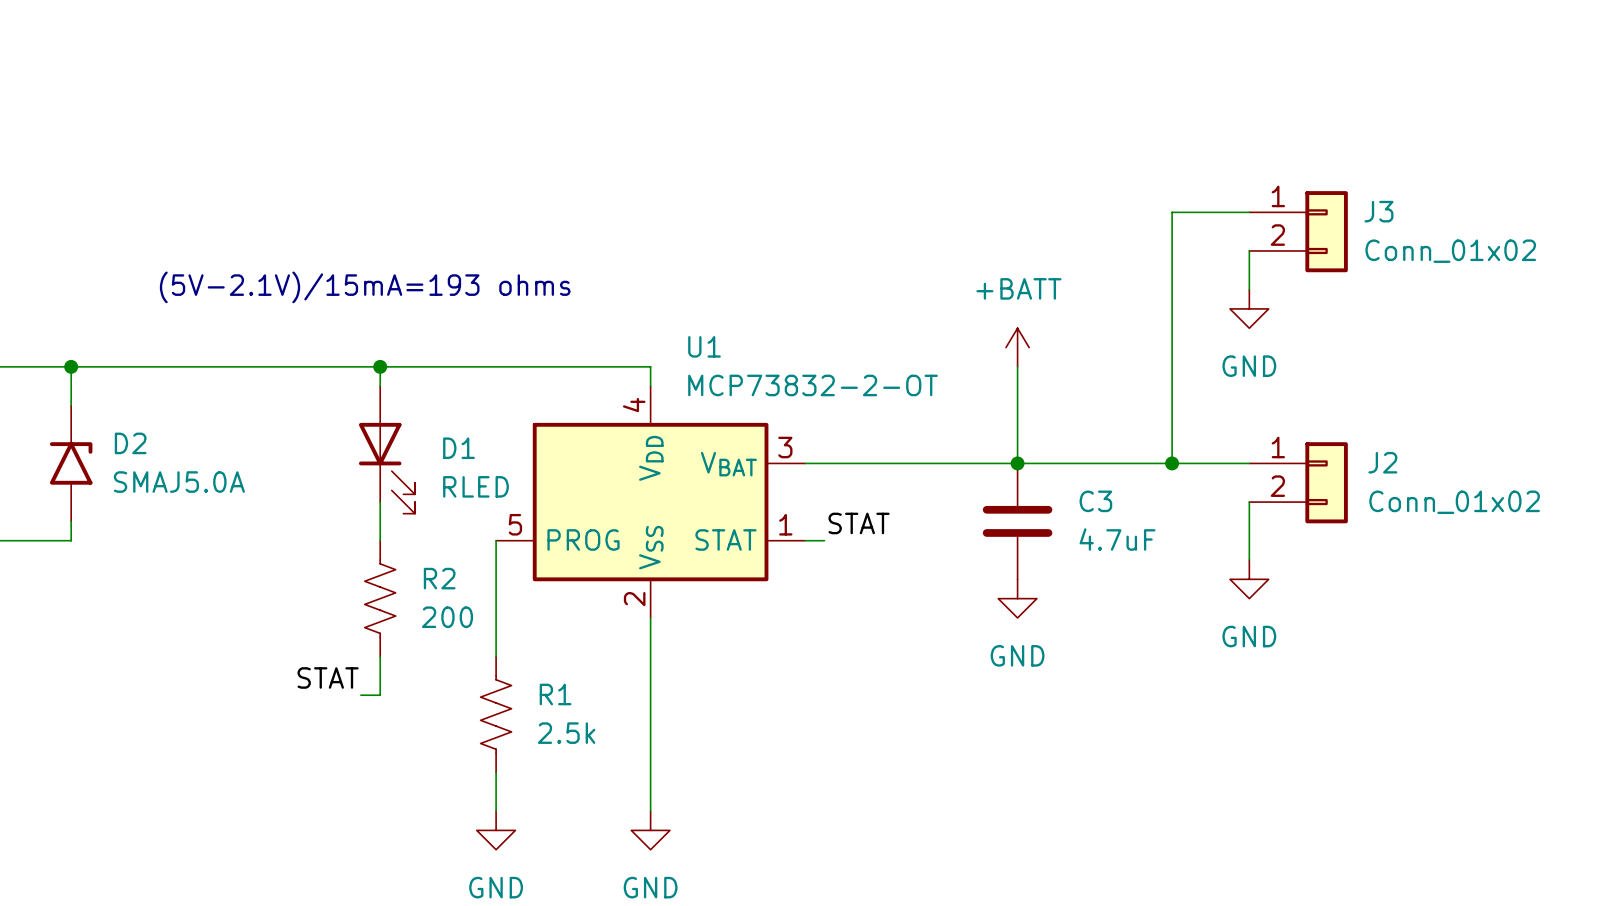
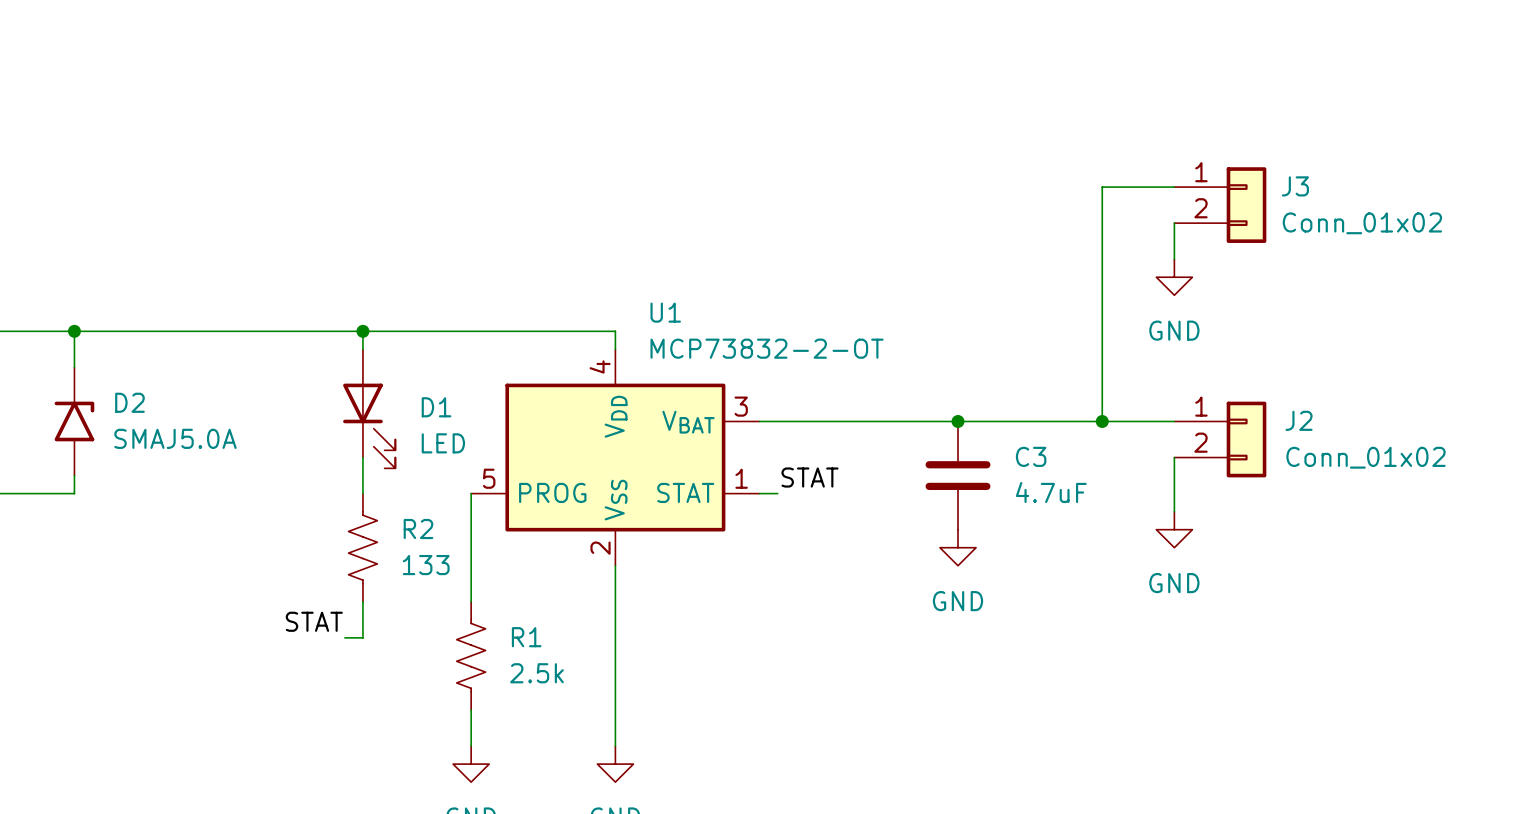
text: (5V-2.1V)/15mA=193 ohms (365, 287) -> none
power symbol: +BATT (1017, 347) -> none
wire: (1017, 366) (1017, 463) -> none
D1 value: RLED (476, 486) -> LED (443, 443)
R2 value: 200 (447, 617) -> 133 (426, 565)

